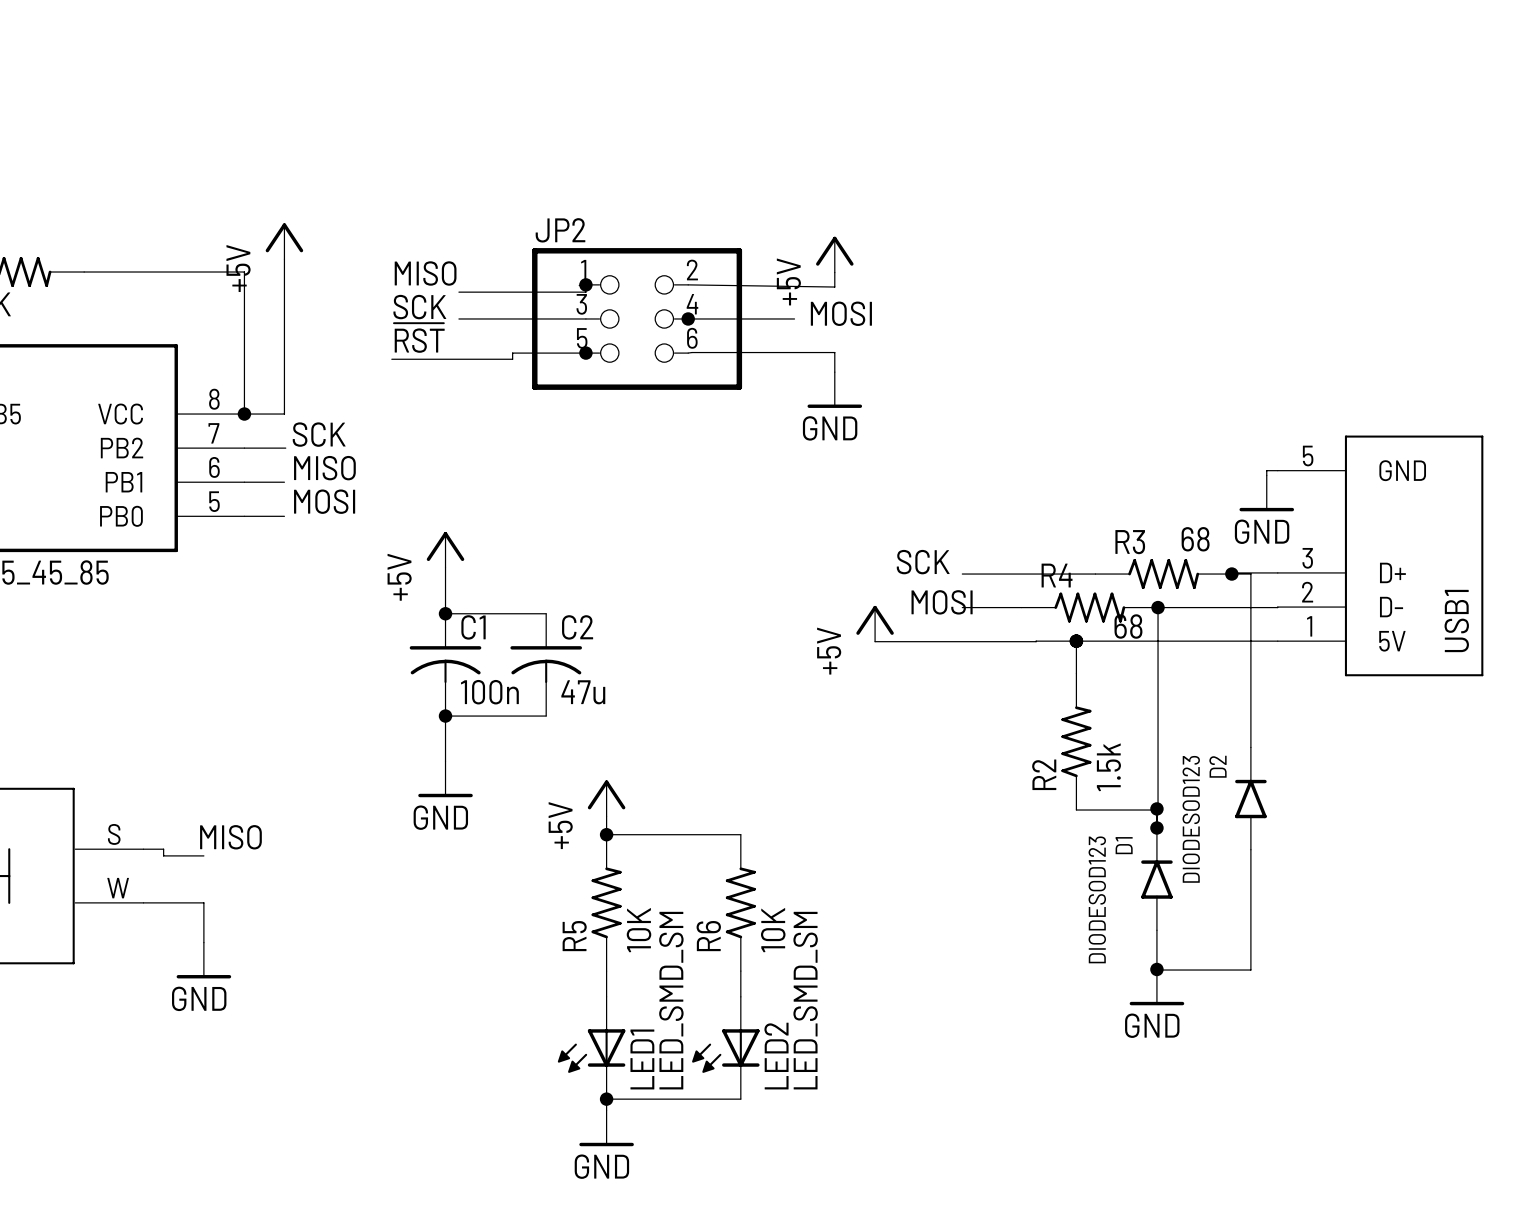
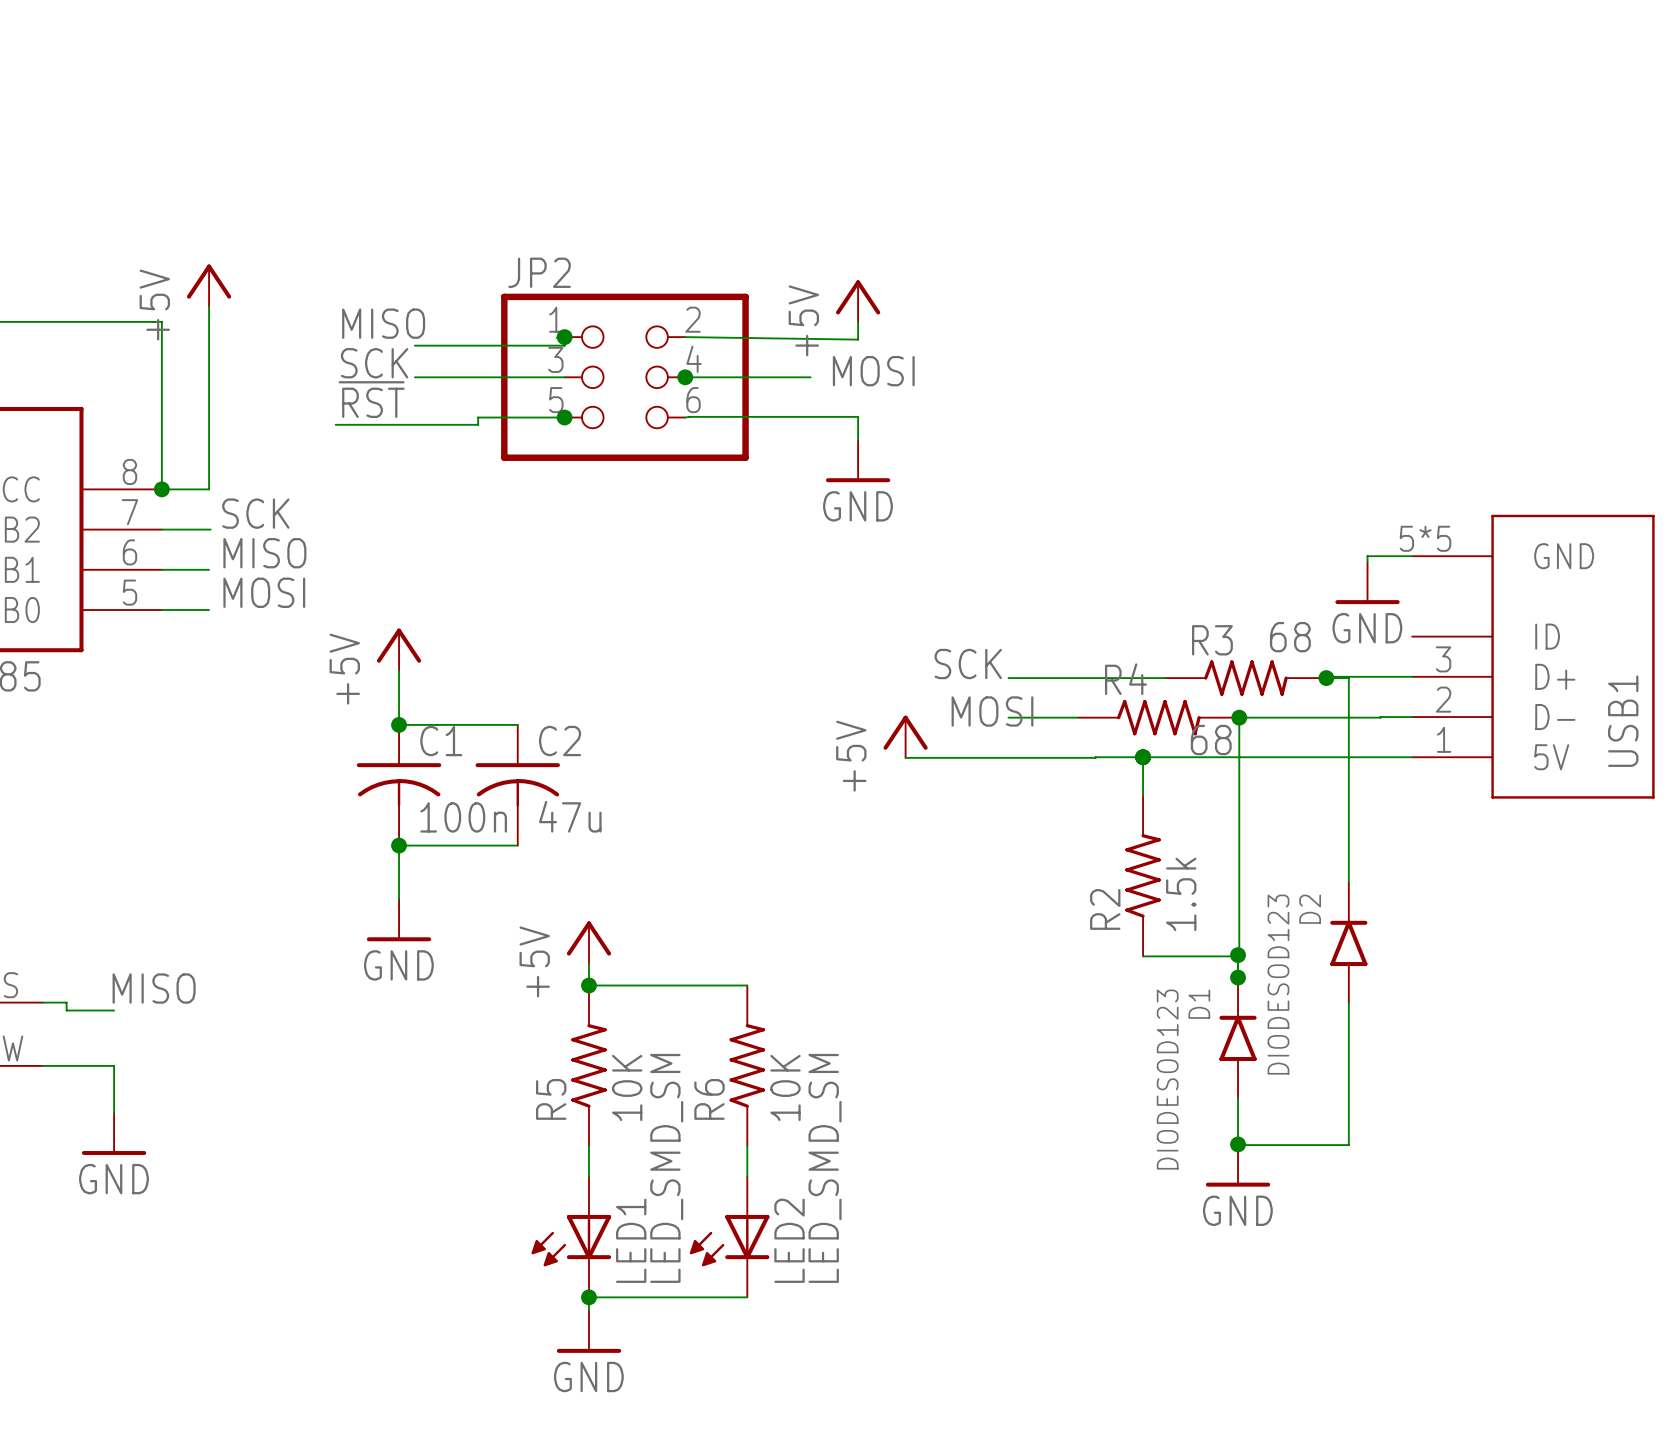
USB1 symbol: [1277, 435, 1484, 677] -> [1412, 514, 1655, 799]

